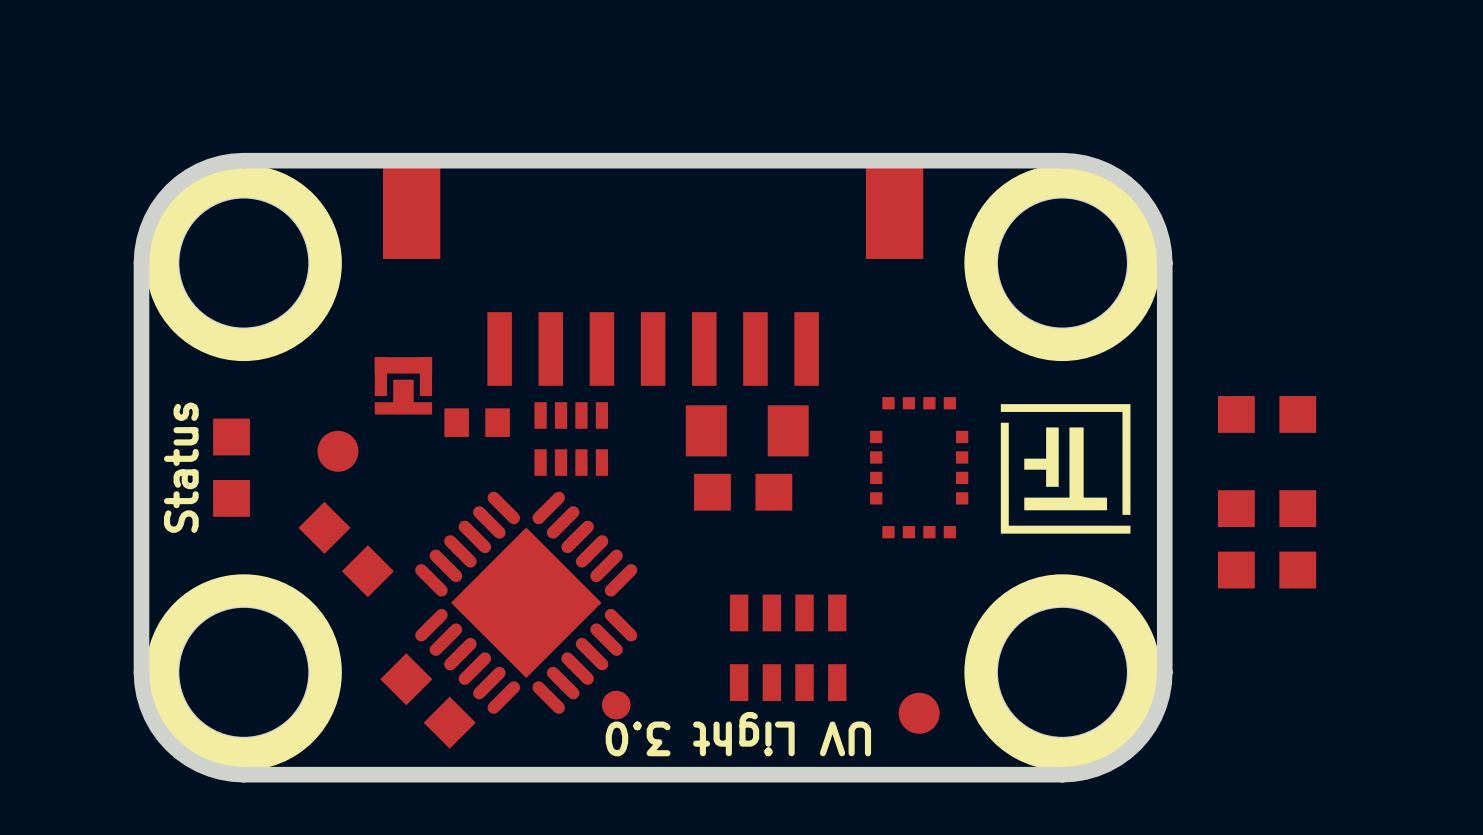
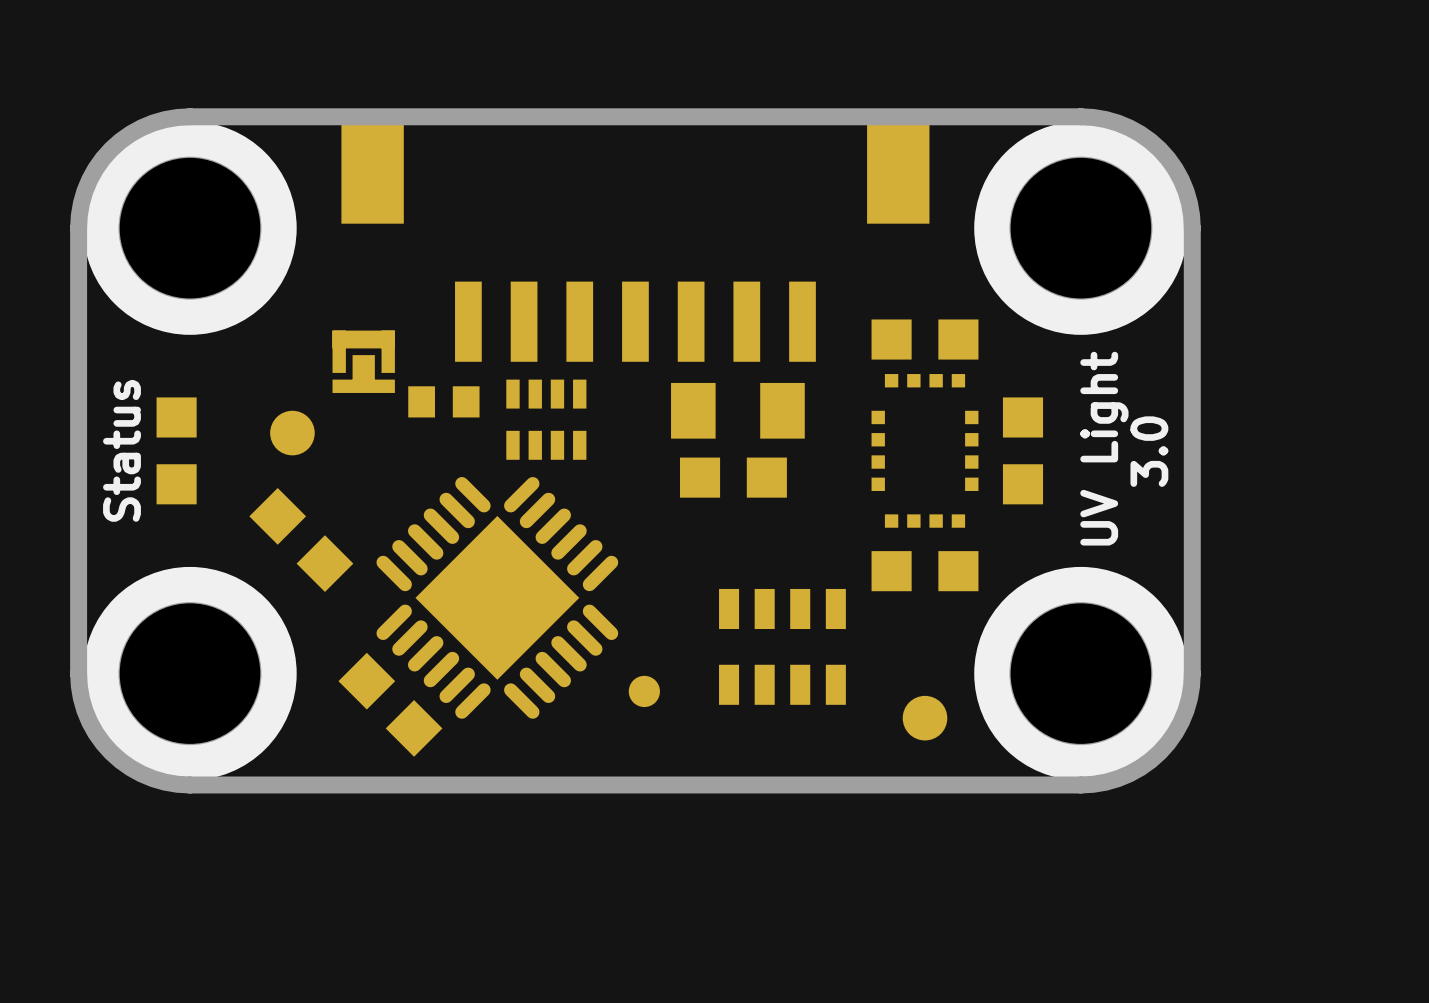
part: none -> (925, 339)
drawing: [1000, 404, 1131, 534] -> none
part: (1267, 414) -> none
text: none -> UV Light (1104, 448)
part: none -> (1023, 450)
text: none -> 3.0 (1149, 451)
part: (1267, 508) -> none
part: (1267, 570) -> none
part: none -> (925, 571)
part position: (616, 705) -> (644, 691)
text: UV Light 3.0 (738, 734) -> none

